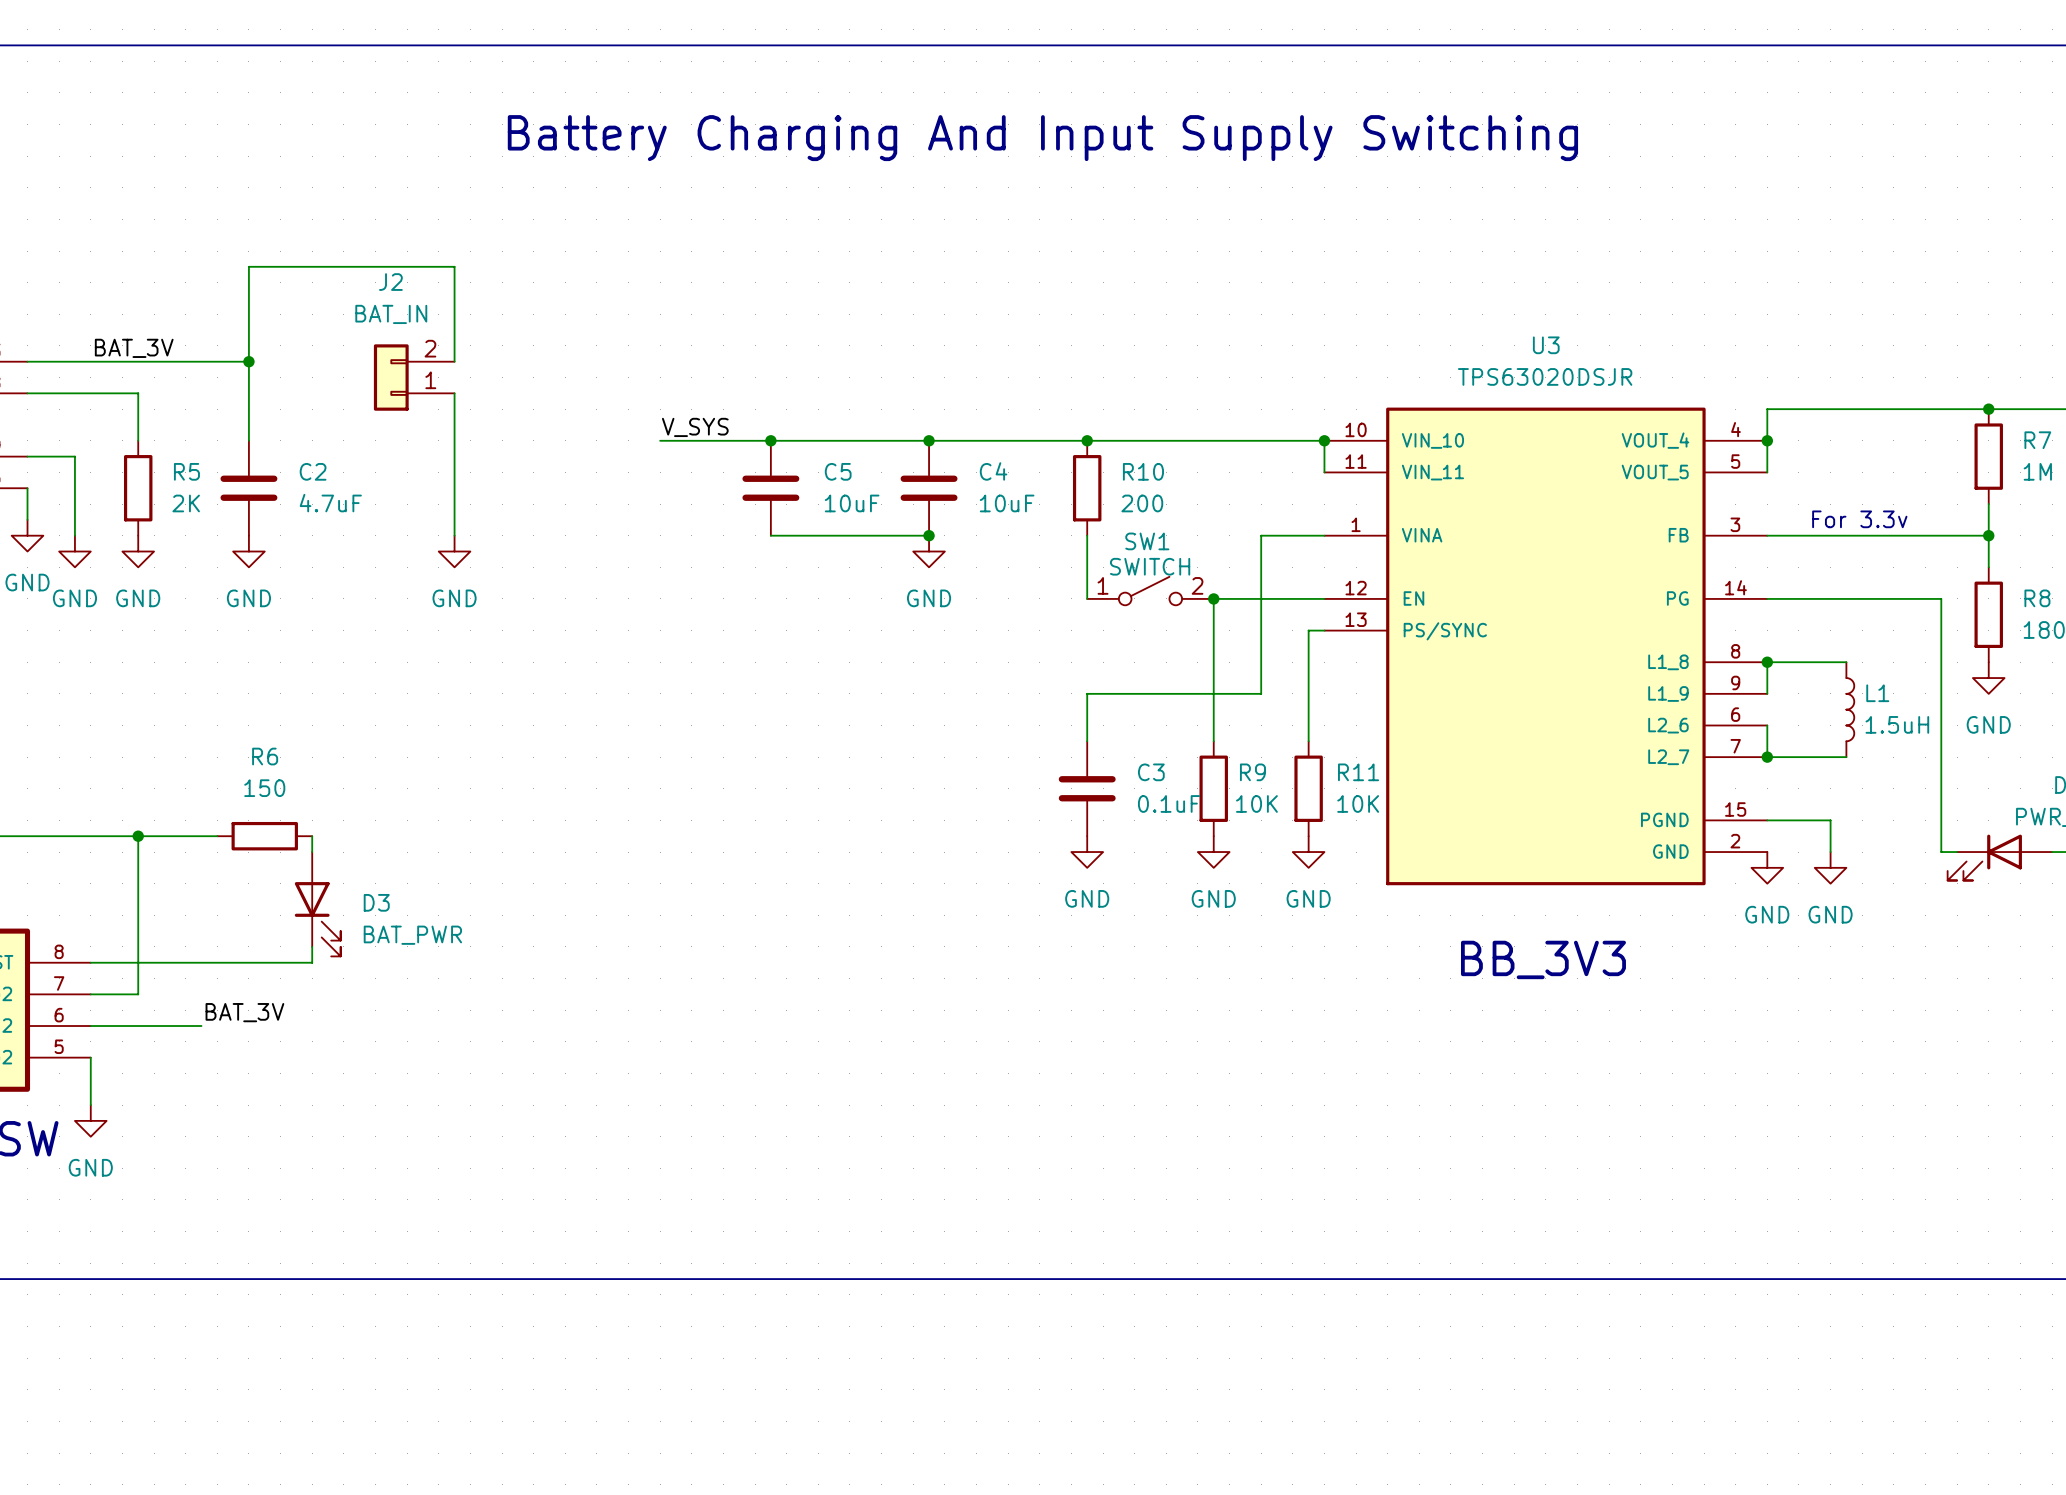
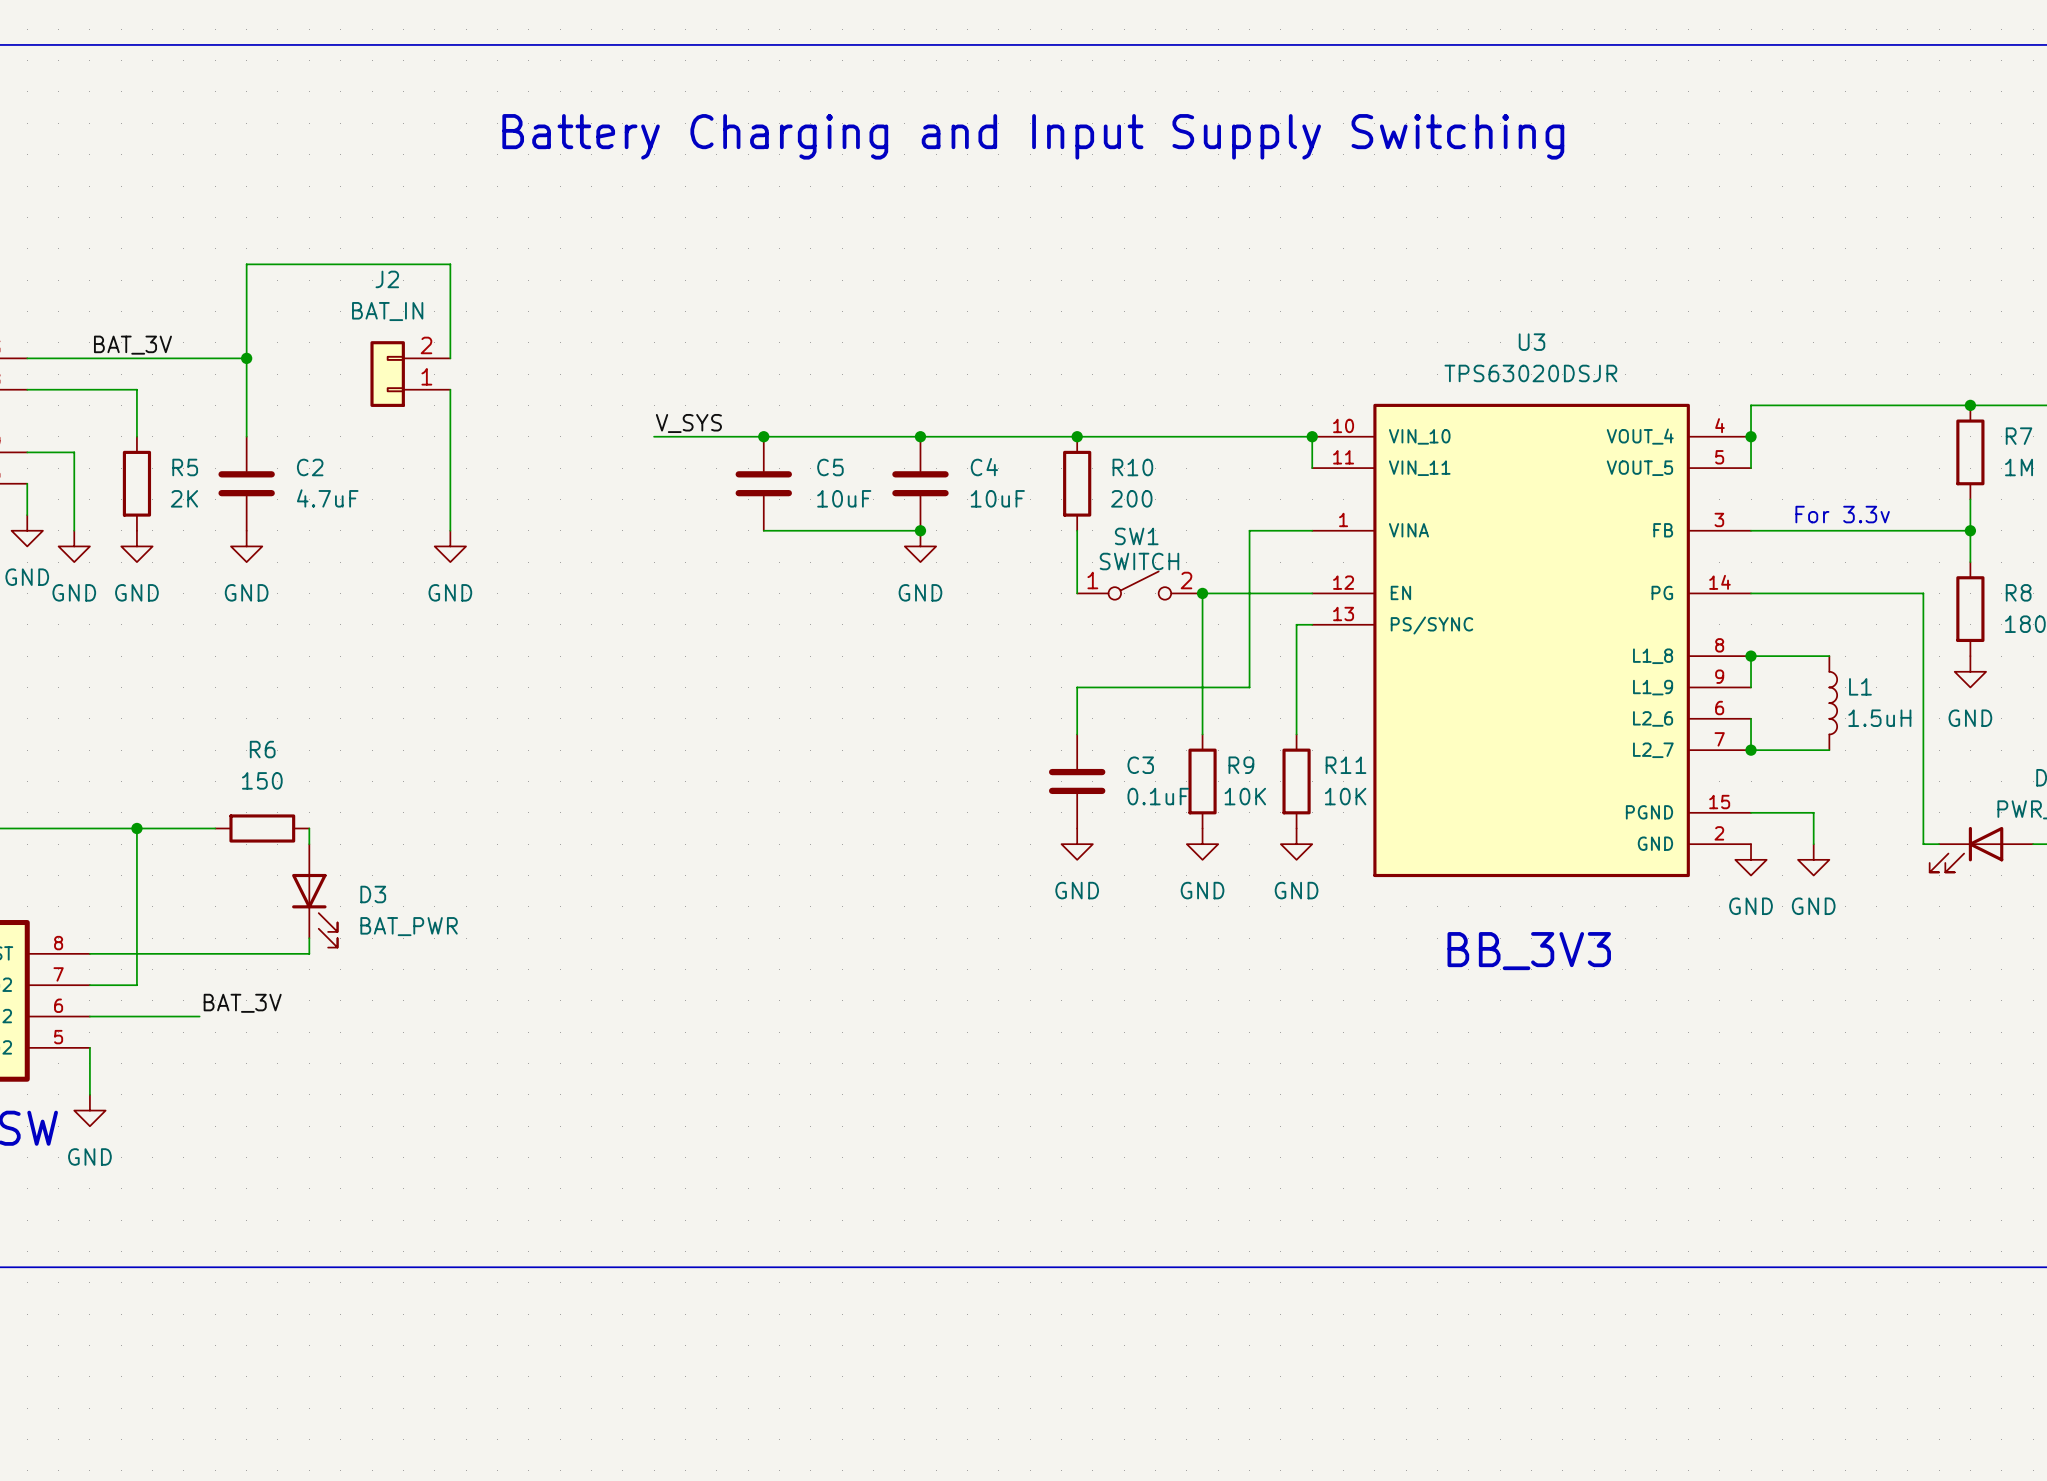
text: Battery Charging And Input Supply Switching (1042, 138) -> Battery Charging and Input Supply Switching (1033, 136)

